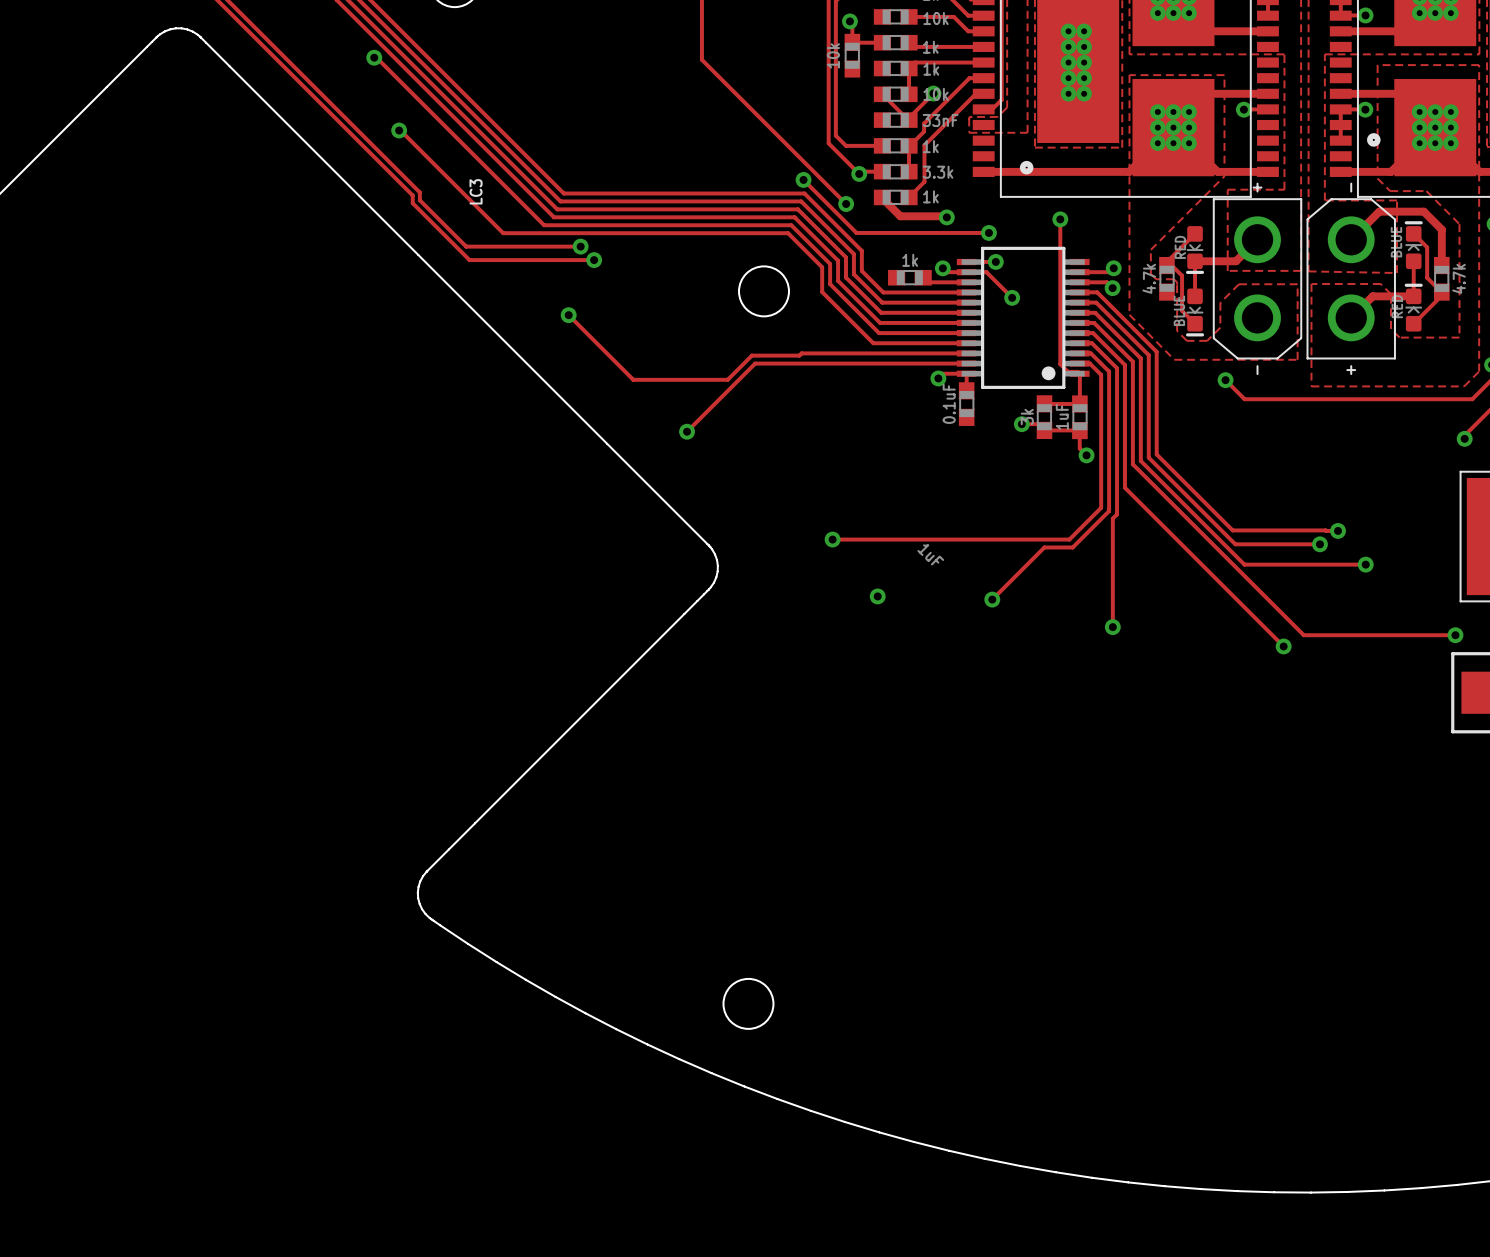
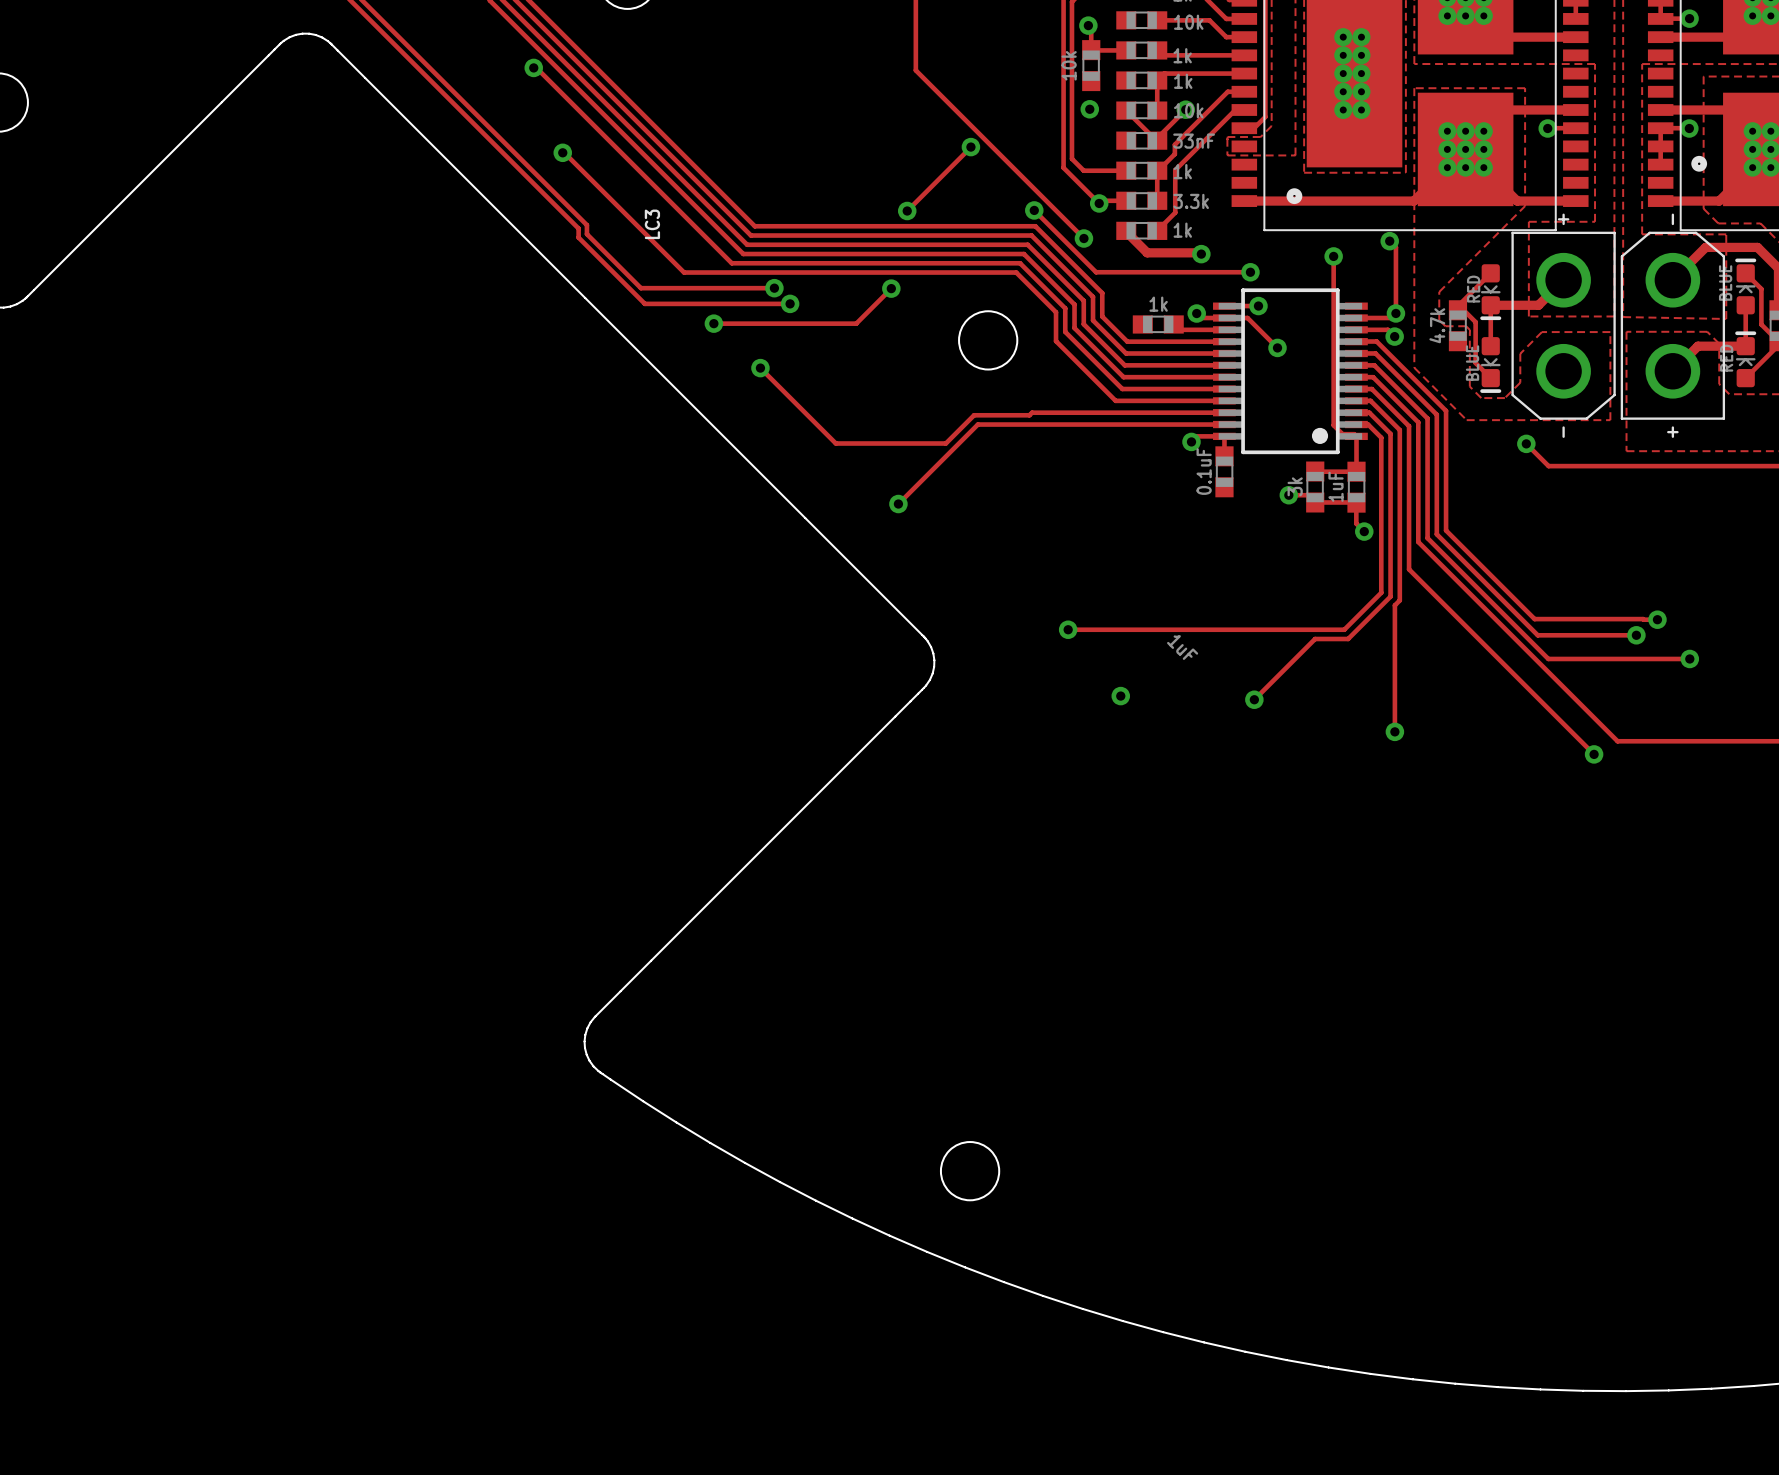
via: none -> (1089, 109)
track: none -> (970, 147) (907, 211)
via: none -> (970, 147)
via: none -> (907, 211)
track: none -> (1389, 241) (1395, 247) (1395, 313)
via: none -> (1389, 241)
track: none -> (891, 288) (856, 323) (713, 323)
via: none -> (891, 288)
via: none -> (713, 323)

